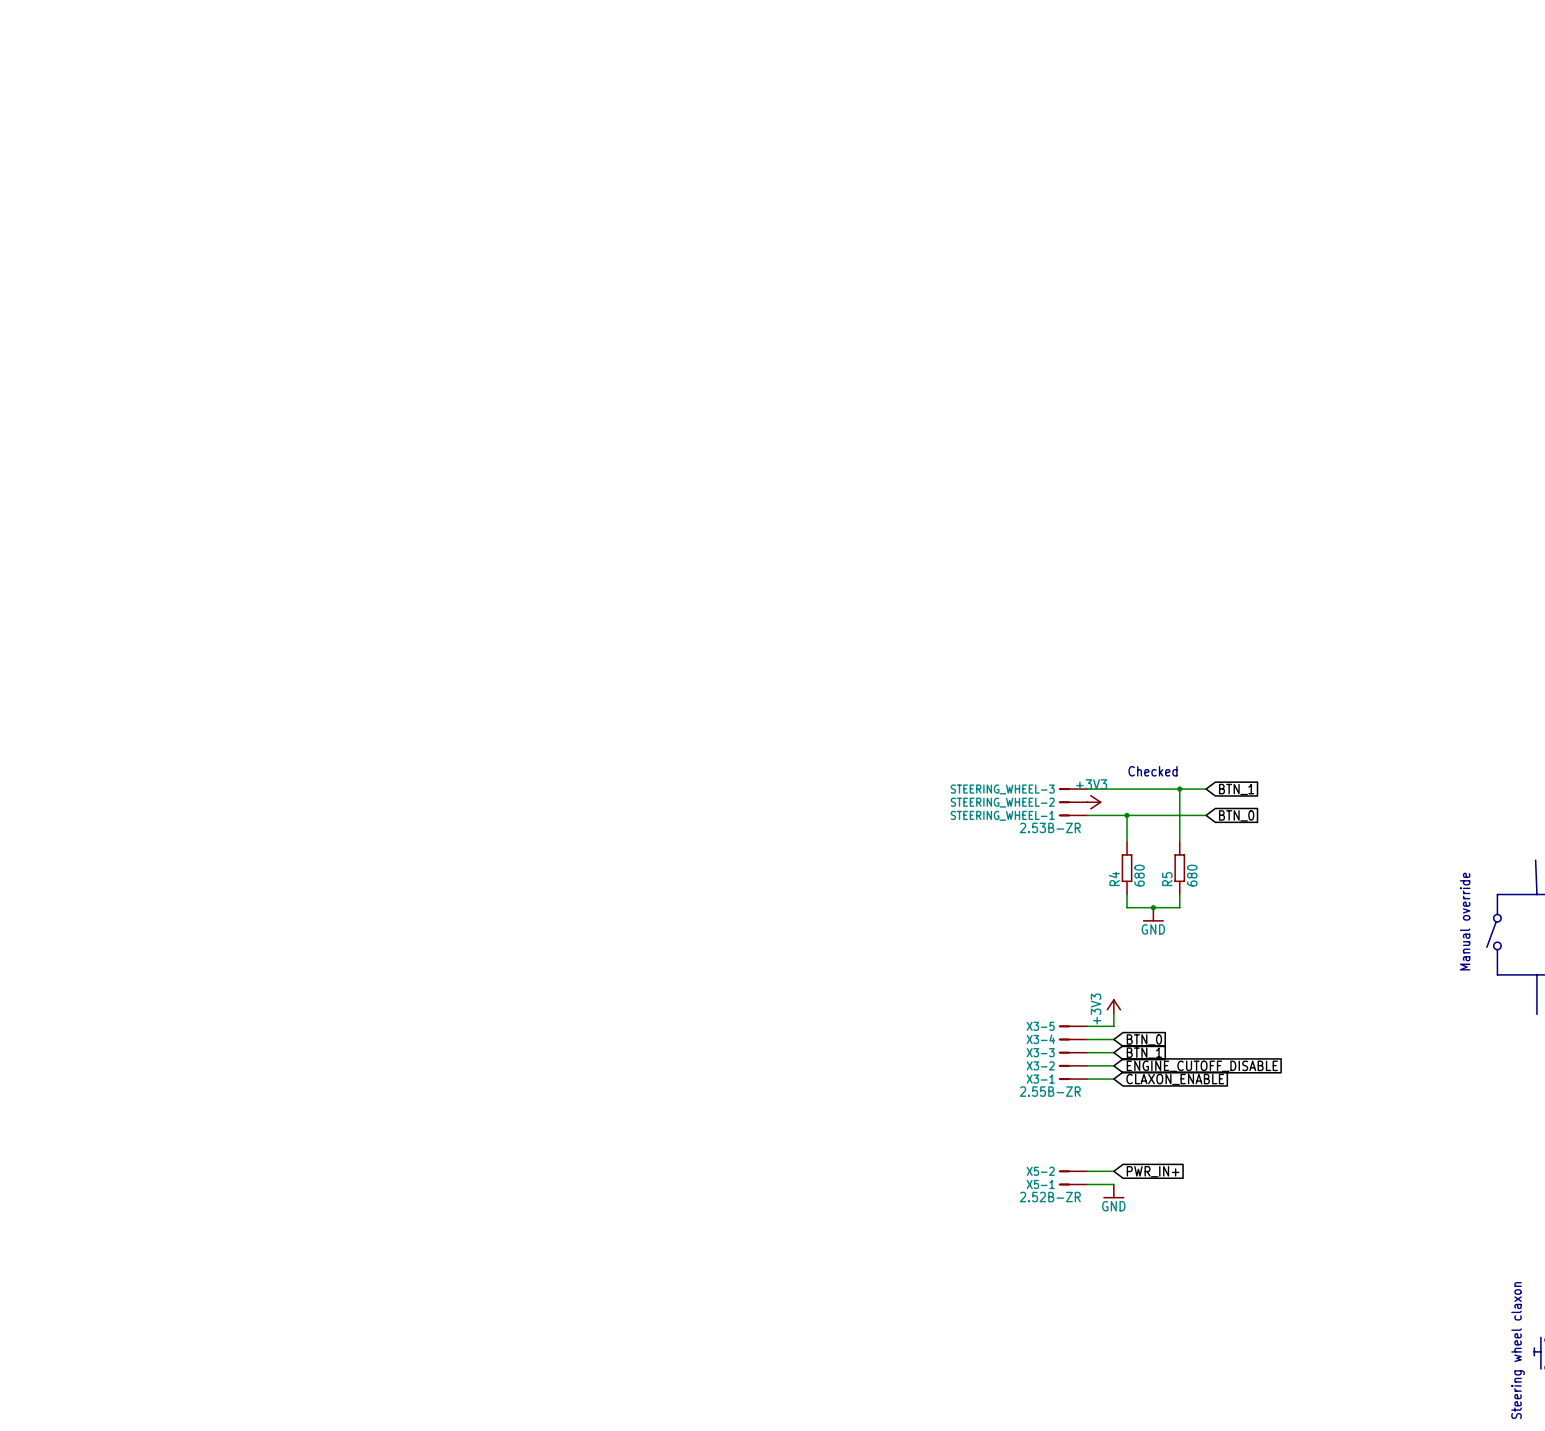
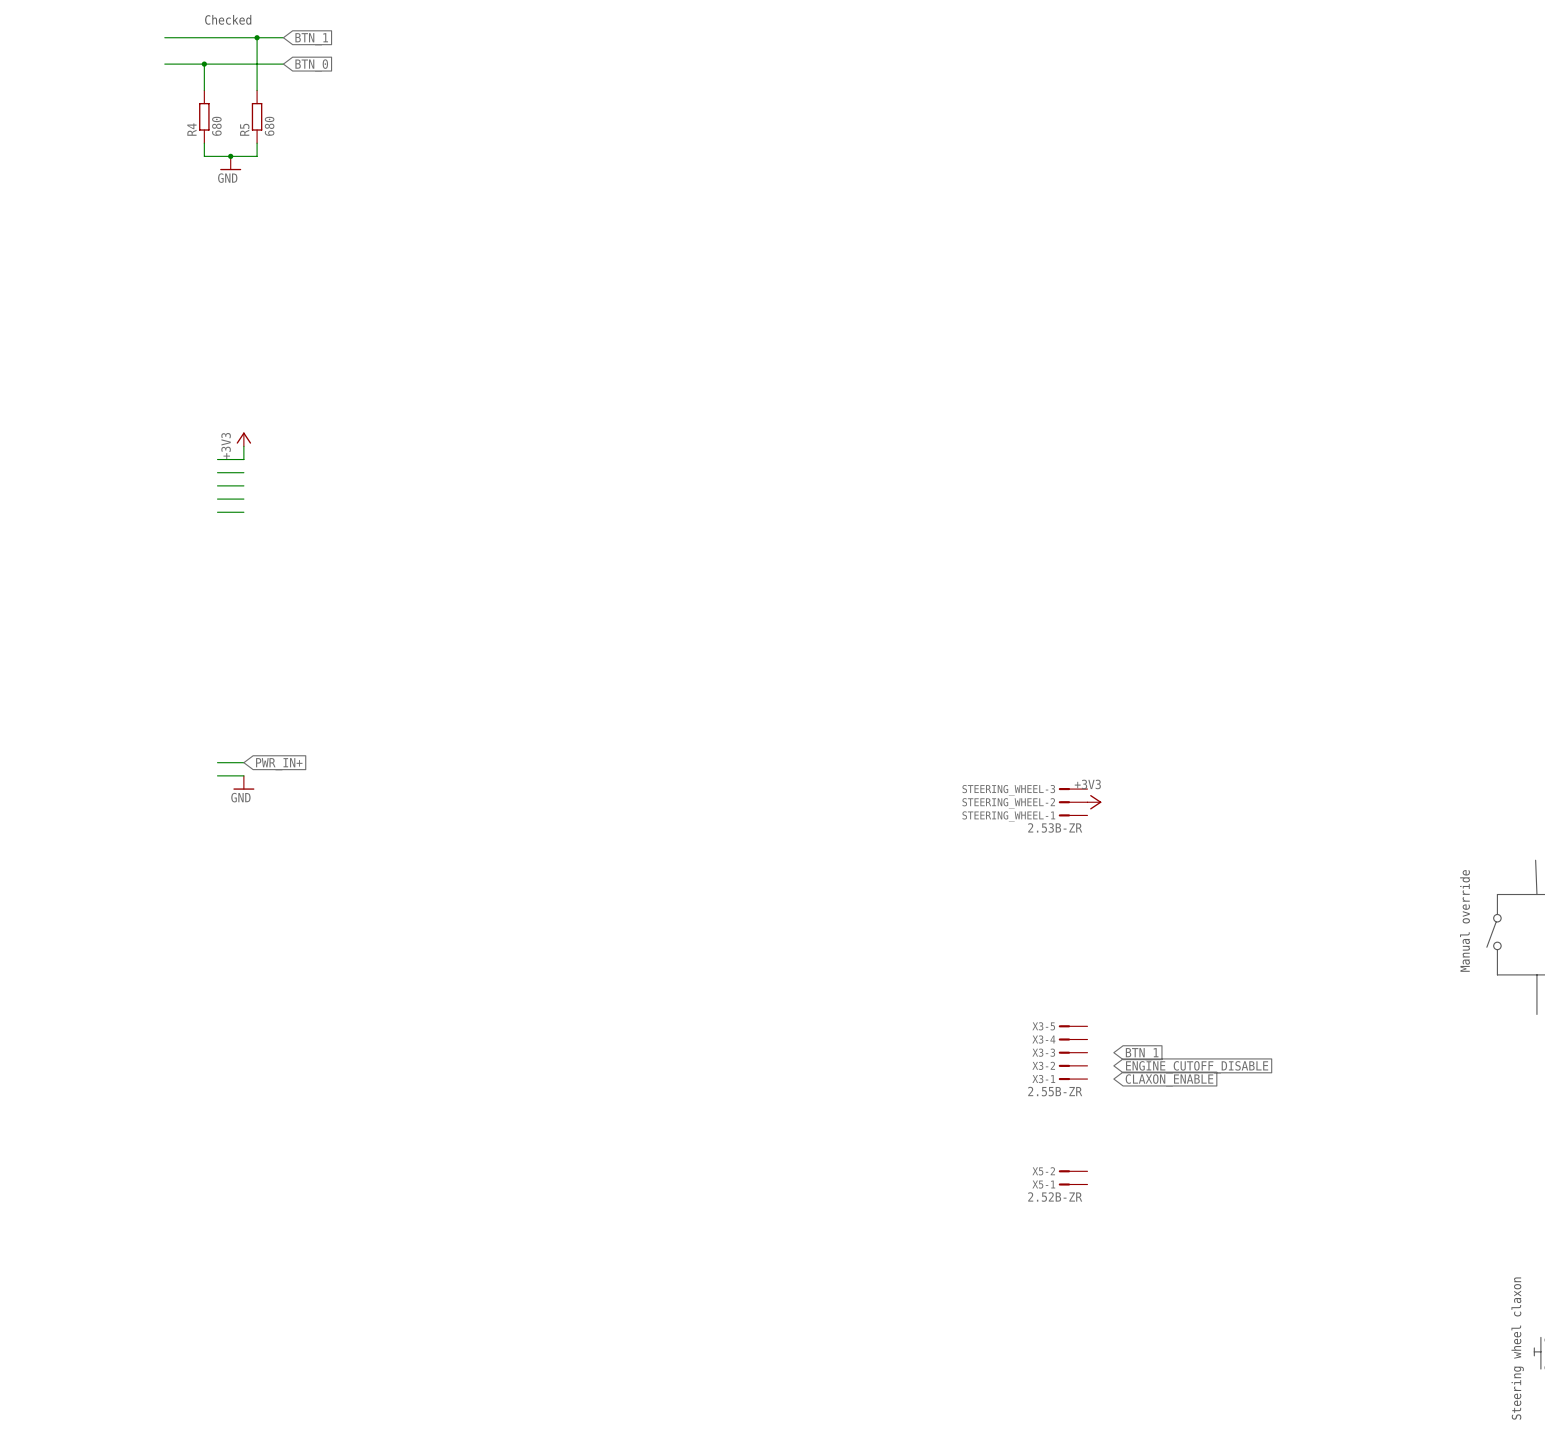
text: none -> Checked (228, 19)
wire: none -> (164, 37) (283, 37)
wire: none -> (257, 37) (257, 90)
junction: none -> (257, 37)
global label: none -> BTN_1 (311, 39)
wire: none -> (164, 64) (283, 64)
wire: none -> (204, 64) (204, 90)
junction: none -> (204, 64)
global label: none -> BTN_0 (311, 65)
wire: none -> (204, 143) (204, 156) (257, 156) (257, 143)
junction: none -> (230, 156)
power symbol: none -> GND (230, 163)
power symbol: none -> +3V3 (243, 439)
wire: none -> (243, 446) (243, 459) (217, 459)
wire: none -> (217, 472) (243, 472)
wire: none -> (217, 485) (243, 485)
wire: none -> (217, 499) (243, 499)
wire: none -> (217, 512) (243, 512)
wire: none -> (217, 762) (243, 762)
global label: none -> PWR_IN+ (279, 764)
text: Checked (1153, 771) -> none
wire: none -> (217, 775) (243, 775)
power symbol: none -> GND (243, 782)
wire: (1087, 789) (1206, 789) -> none
wire: (1179, 789) (1179, 841) -> none
junction: (1179, 789) -> none
global label: BTN_1 (1236, 789) -> none
wire: (1087, 815) (1206, 815) -> none
wire: (1127, 815) (1127, 841) -> none
junction: (1127, 815) -> none
global label: BTN_0 (1236, 815) -> none
R4 position: (1127, 868) -> (204, 116)
R5 position: (1179, 868) -> (257, 116)
wire: (1127, 894) (1127, 907) (1179, 907) (1179, 894) -> none
junction: (1153, 907) -> none
power symbol: GND (1153, 914) -> none
power symbol: +3V3 (1113, 1006) -> none
wire: (1113, 1013) (1113, 1026) (1087, 1026) -> none
wire: (1087, 1039) (1113, 1039) -> none
global label: BTN_0 (1144, 1039) -> none
wire: (1087, 1052) (1113, 1052) -> none
wire: (1087, 1065) (1113, 1065) -> none
wire: (1087, 1079) (1113, 1079) -> none
wire: (1087, 1171) (1113, 1171) -> none
global label: PWR_IN+ (1153, 1171) -> none
wire: (1087, 1184) (1113, 1184) -> none
power symbol: GND (1113, 1191) -> none

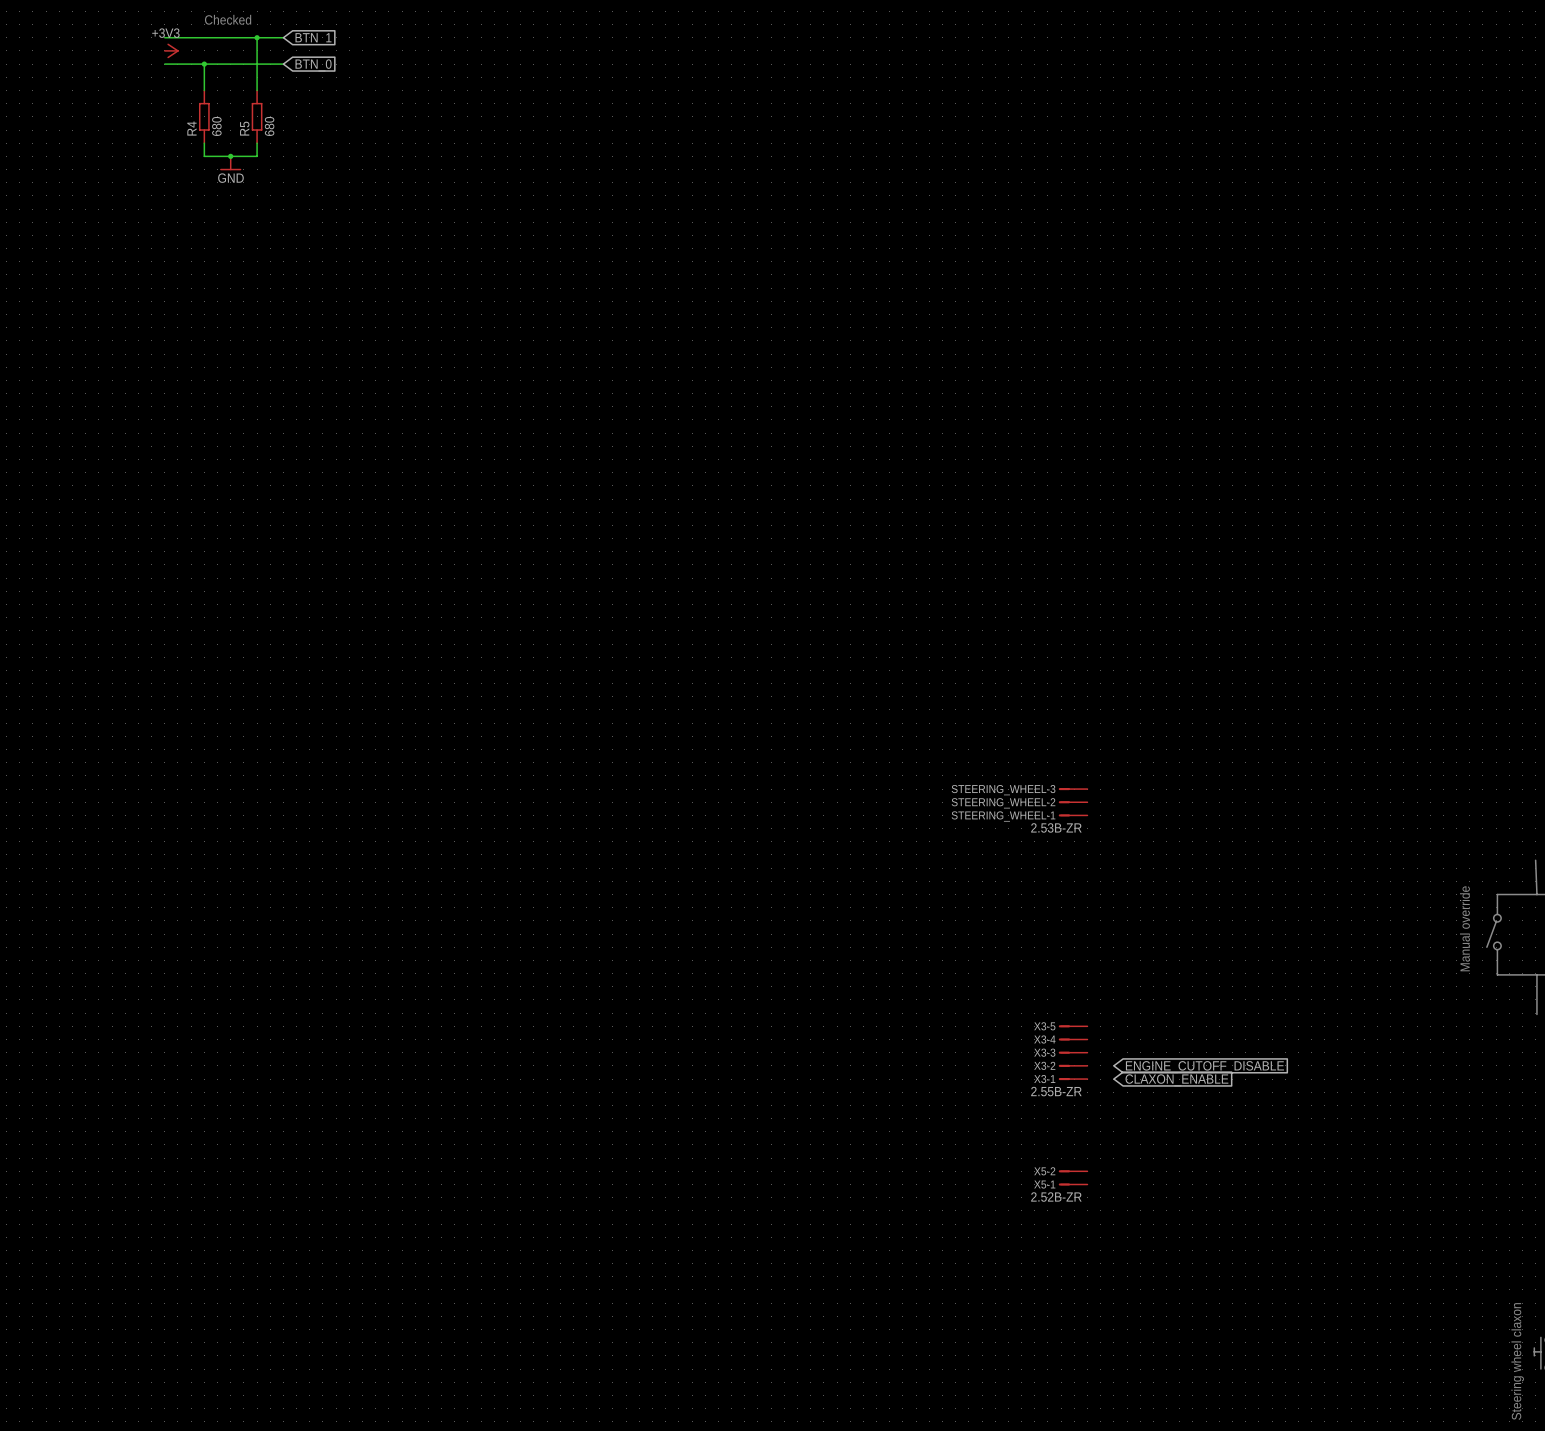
power symbol: none -> +3V3 (171, 50)
power symbol: +3V3 (243, 439) -> none
wire: (243, 446) (243, 459) (217, 459) -> none
wire: (217, 472) (243, 472) -> none
wire: (217, 485) (243, 485) -> none
wire: (217, 499) (243, 499) -> none
wire: (217, 512) (243, 512) -> none
wire: (217, 762) (243, 762) -> none
global label: PWR_IN+ (279, 764) -> none
wire: (217, 775) (243, 775) -> none
power symbol: GND (243, 782) -> none
power symbol: +3V3 (1094, 802) -> none
global label: BTN_1 (1142, 1054) -> none

